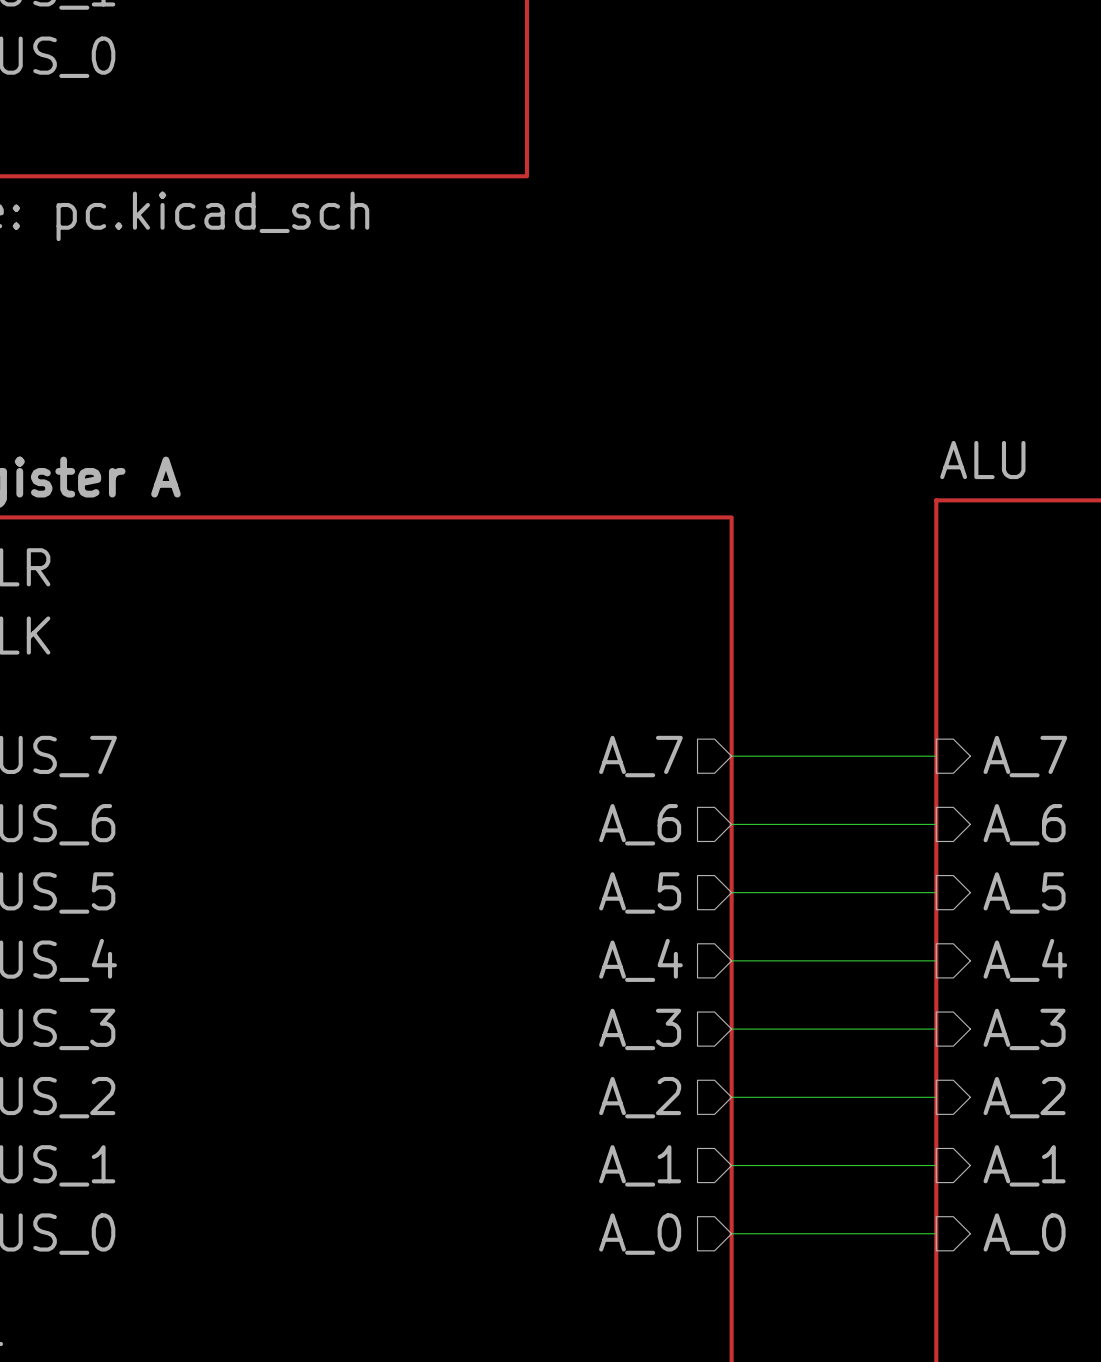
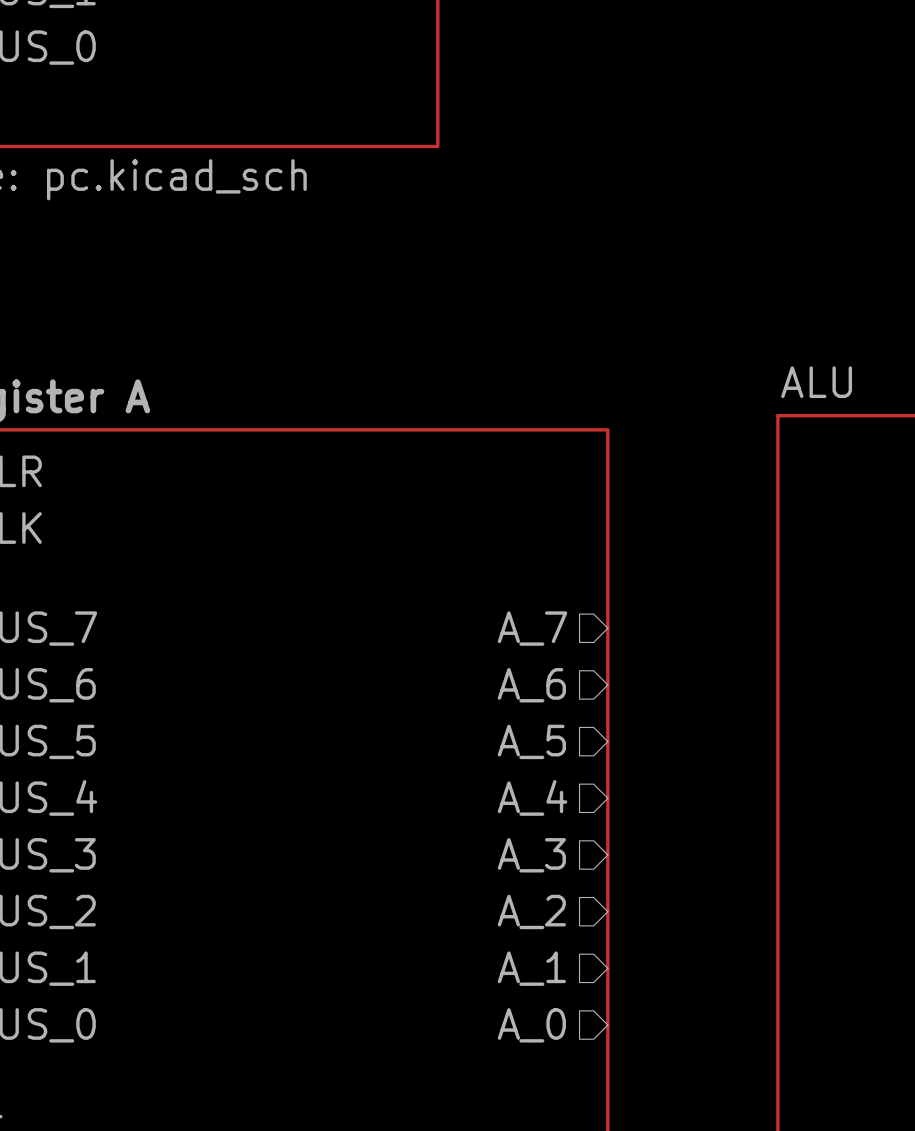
wire: (731, 756) (936, 756) -> none
sheet pin: A_7 (1025, 756) -> none
wire: (731, 824) (936, 824) -> none
sheet pin: A_6 (1024, 824) -> none
wire: (731, 892) (936, 892) -> none
sheet pin: A_5 (1024, 892) -> none
wire: (731, 960) (936, 960) -> none
sheet pin: A_4 (1025, 960) -> none
wire: (731, 1029) (936, 1029) -> none
sheet pin: A_3 (1024, 1029) -> none
wire: (731, 1097) (936, 1097) -> none
sheet pin: A_2 (1024, 1097) -> none
wire: (731, 1165) (936, 1165) -> none
sheet pin: A_1 (1024, 1165) -> none
wire: (731, 1233) (936, 1233) -> none
sheet pin: A_0 (1024, 1234) -> none

